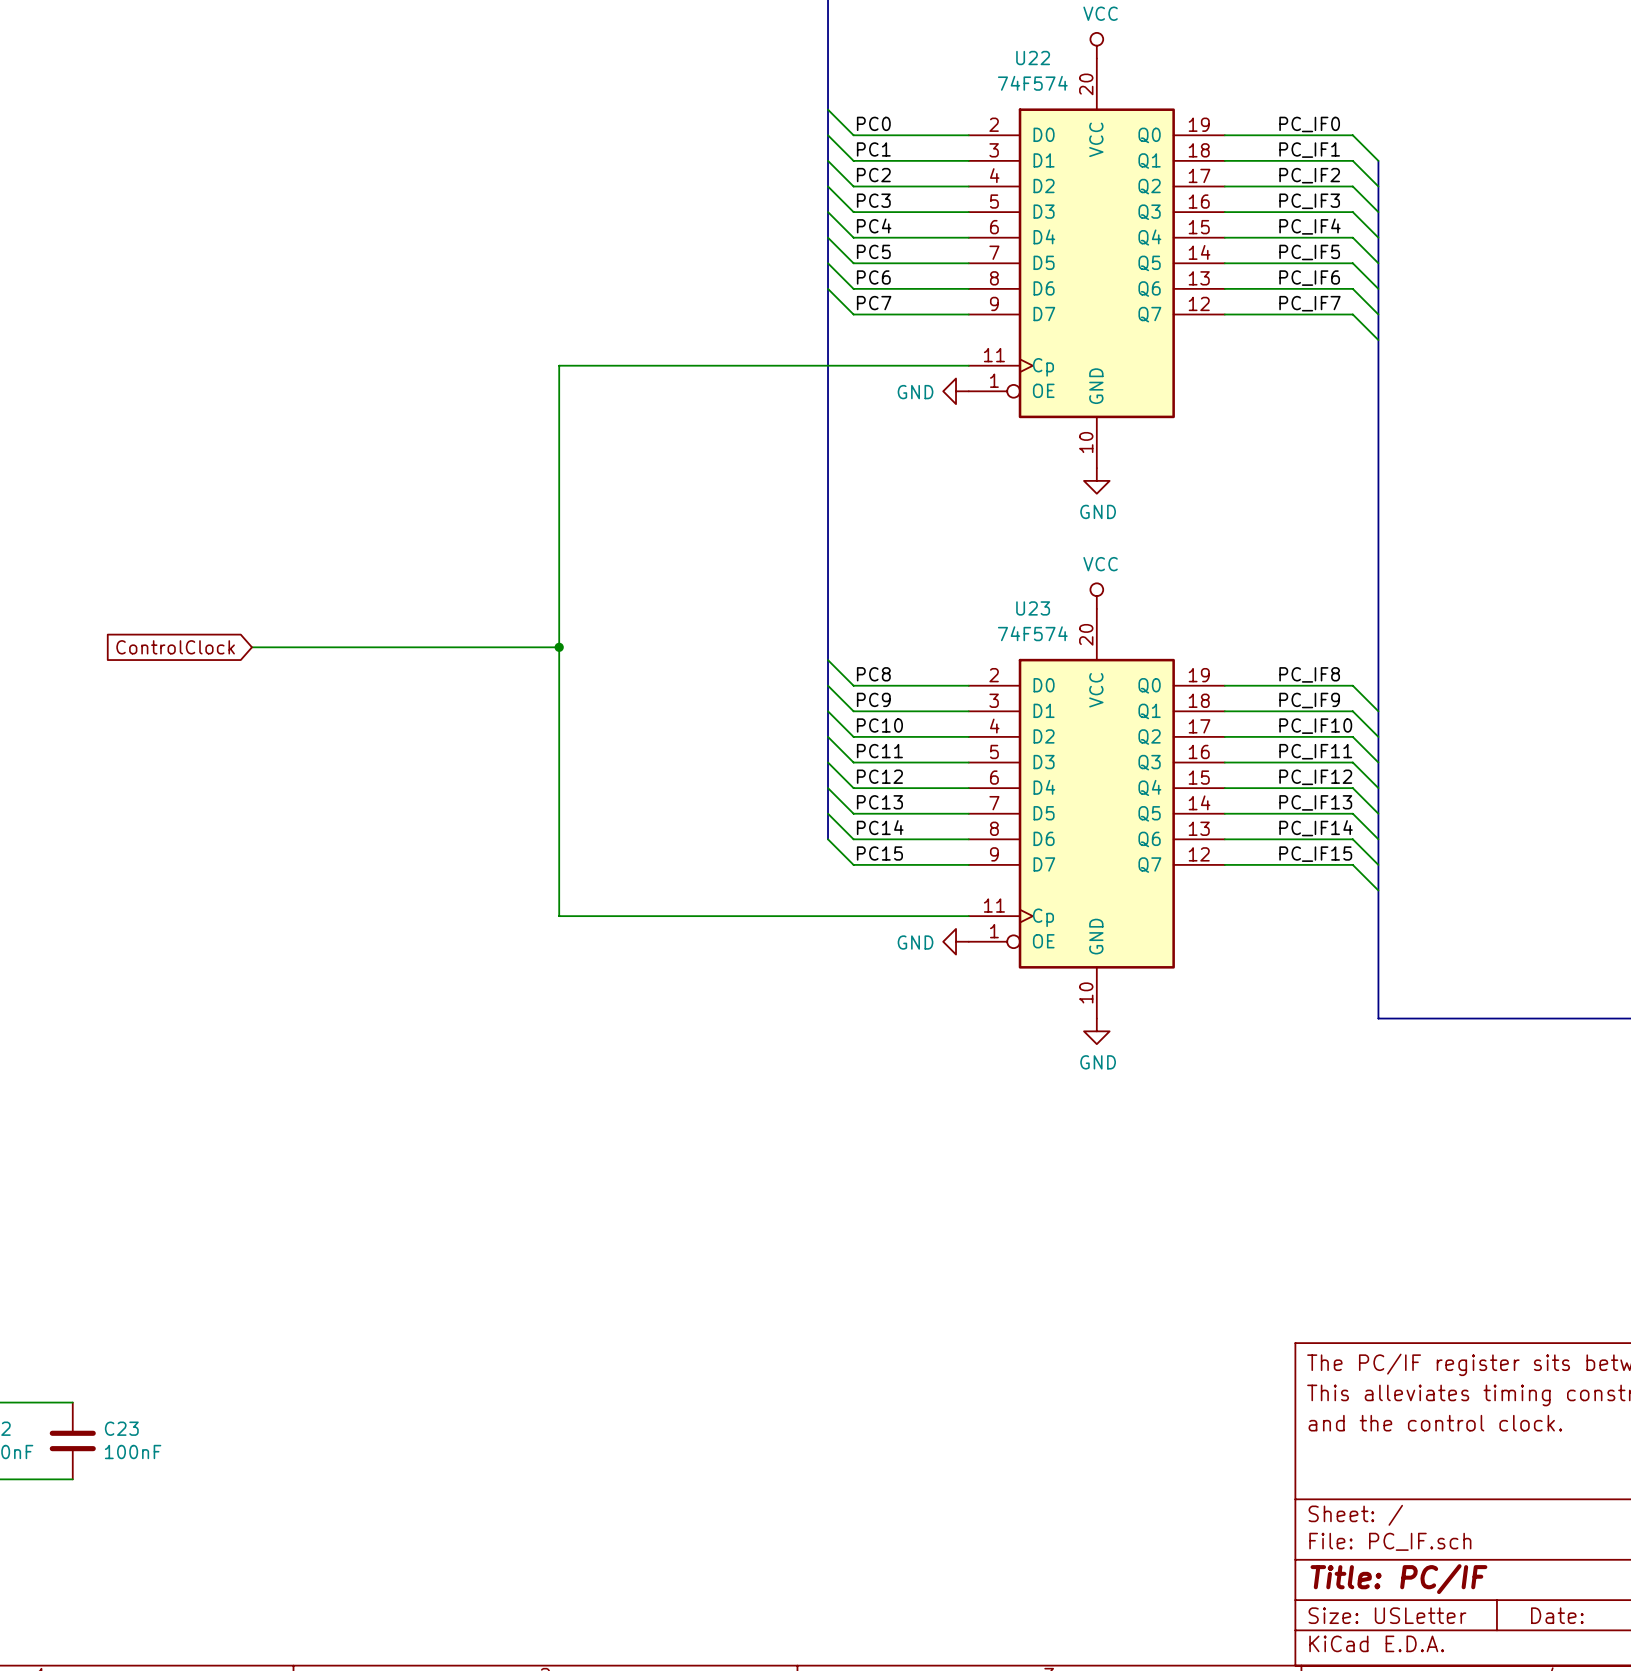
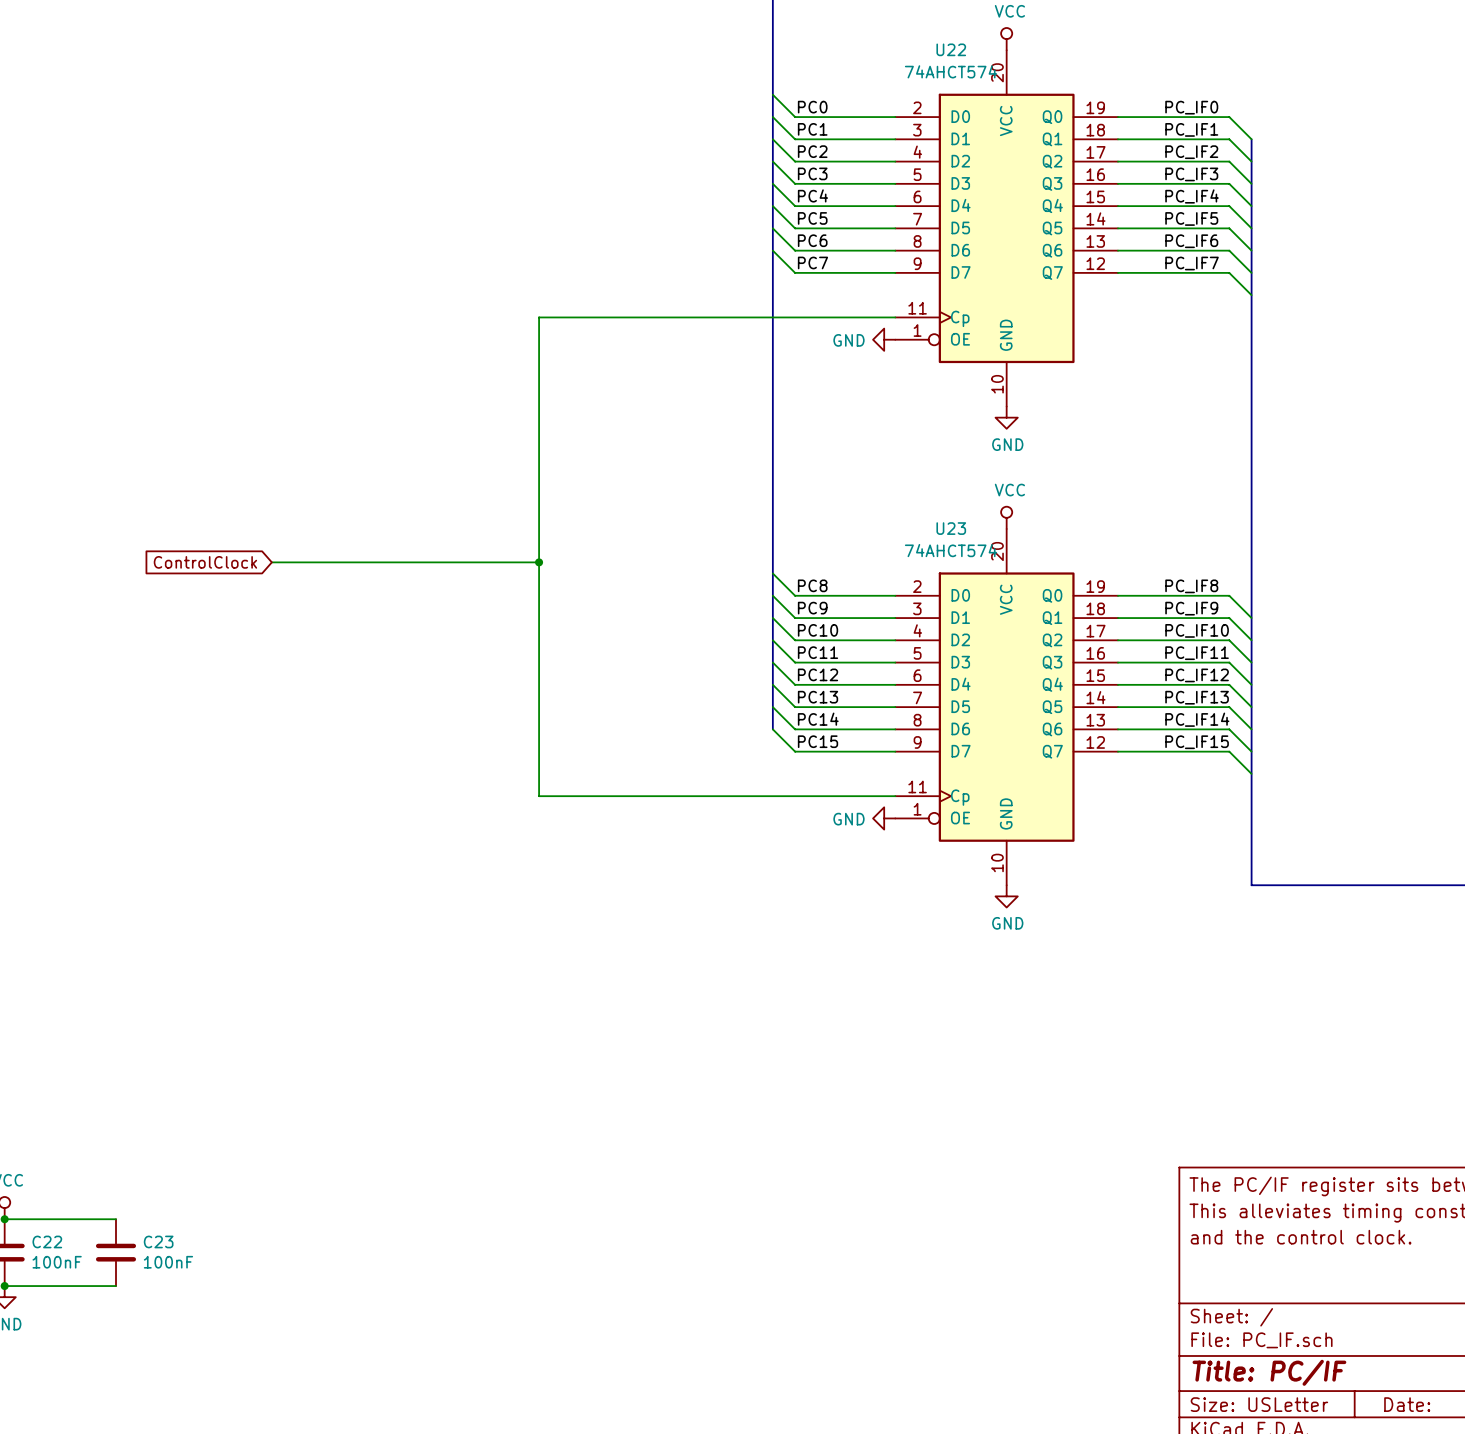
U22 value: 74F574 (1032, 83) -> 74AHCT574 (950, 71)
U23 value: 74F574 (1032, 633) -> 74AHCT574 (950, 550)

